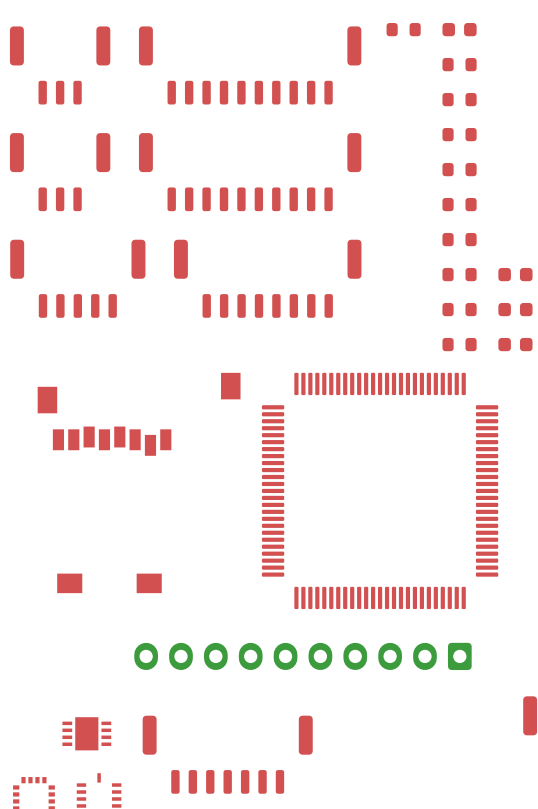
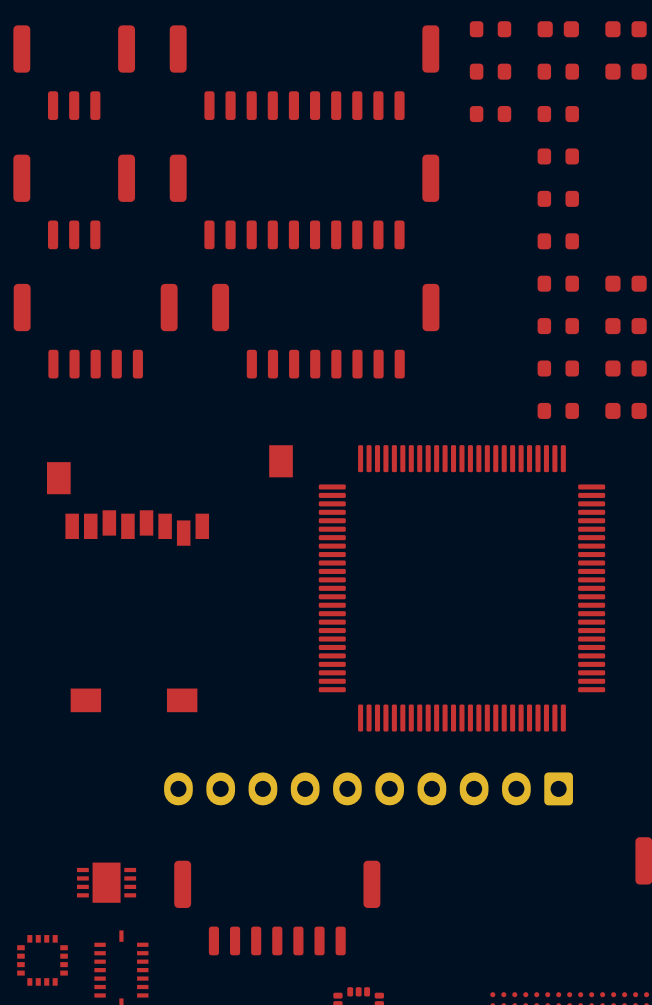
part: none -> (626, 29)
part: none -> (490, 71)
part: none -> (626, 71)
part: none -> (490, 114)
part: none -> (626, 283)

